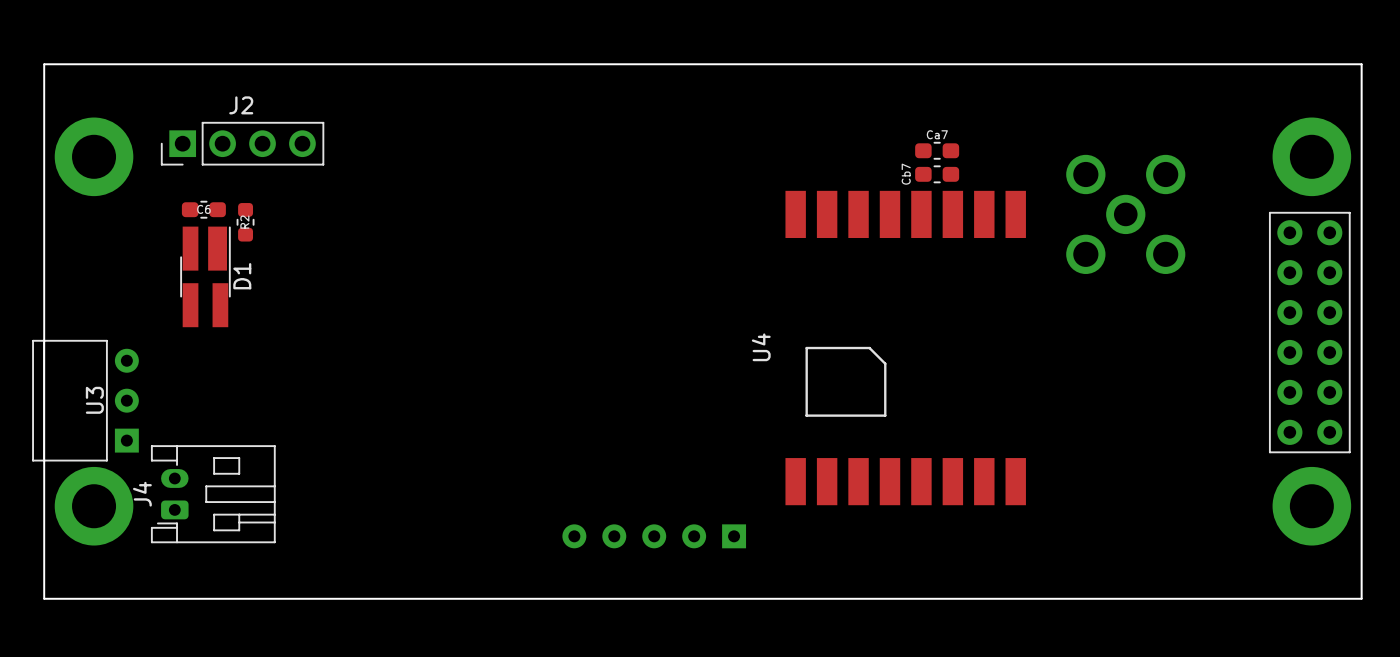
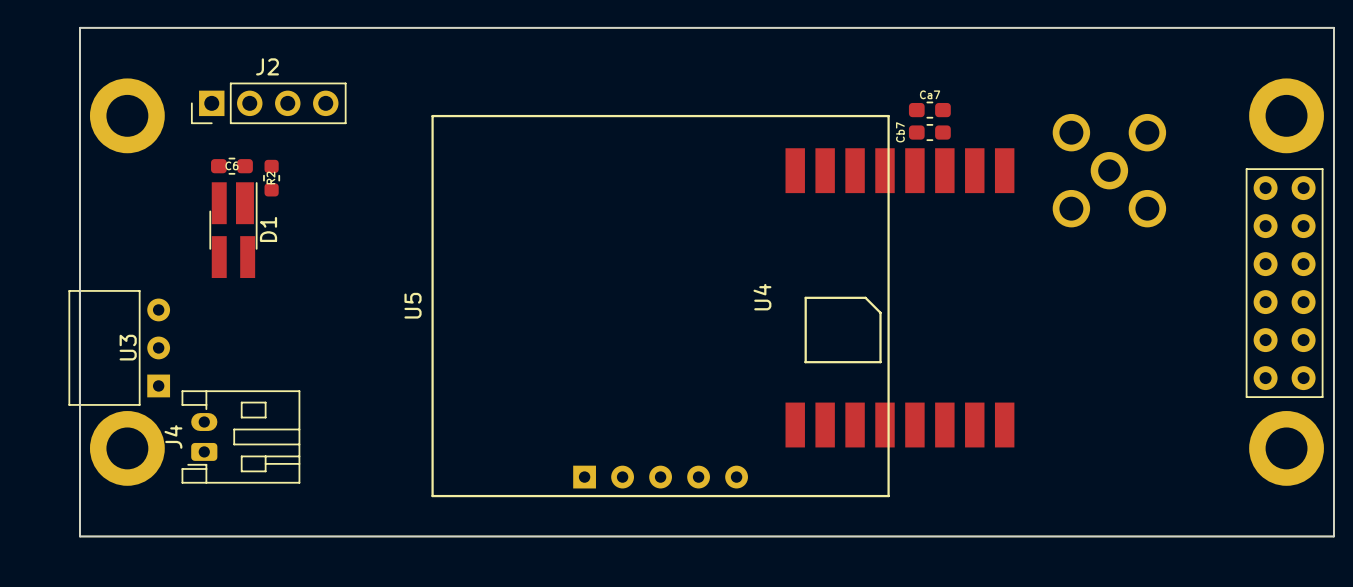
U5 side: bottom (654, 536) -> top (660, 306)

